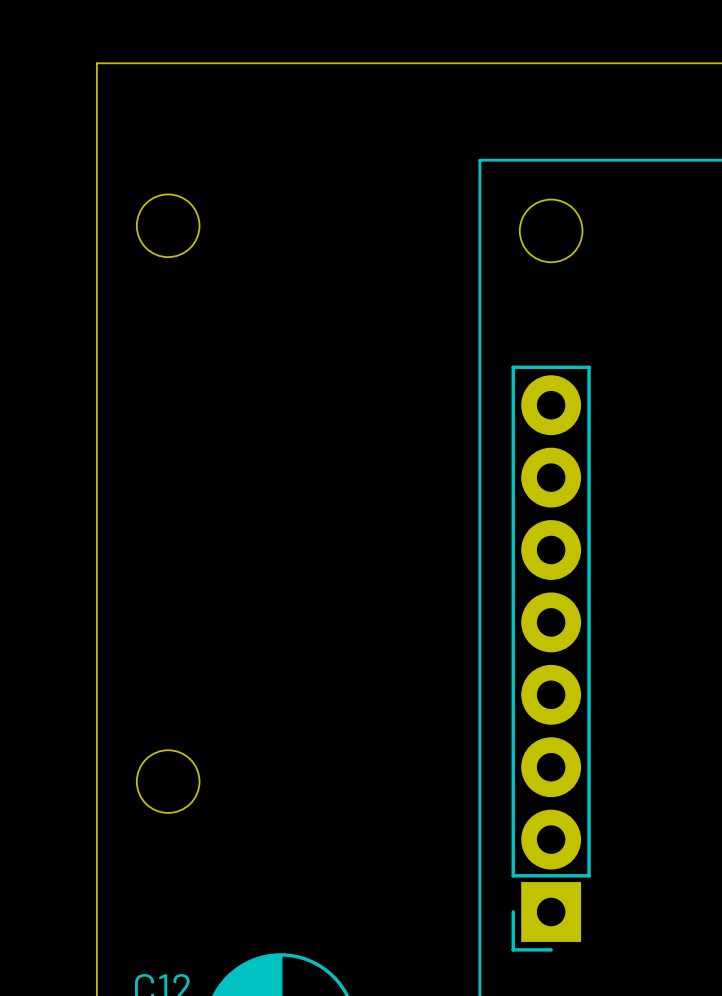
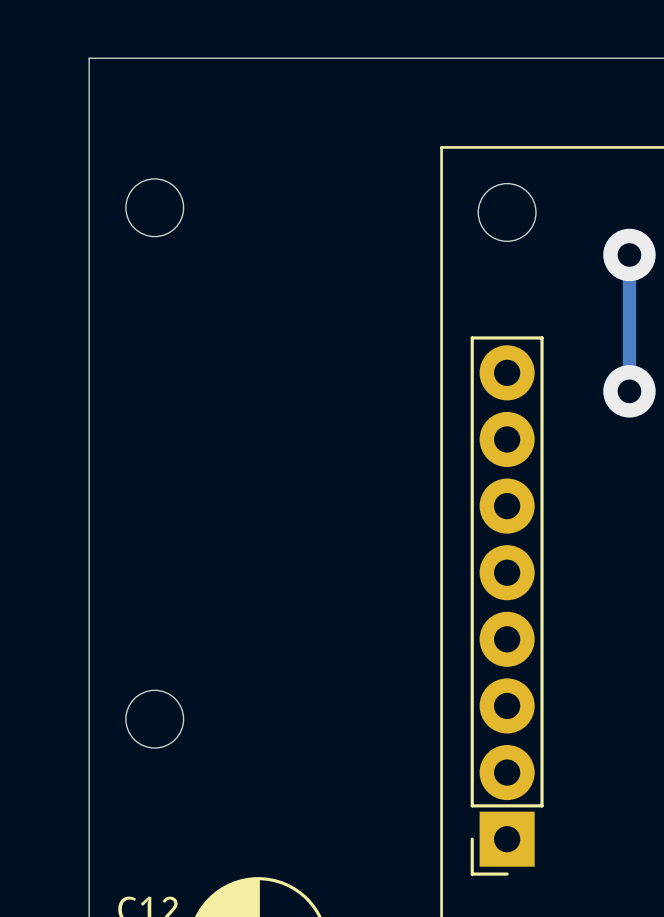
track: none -> (629, 254) (629, 391)
via: none -> (629, 254)
via: none -> (629, 391)

